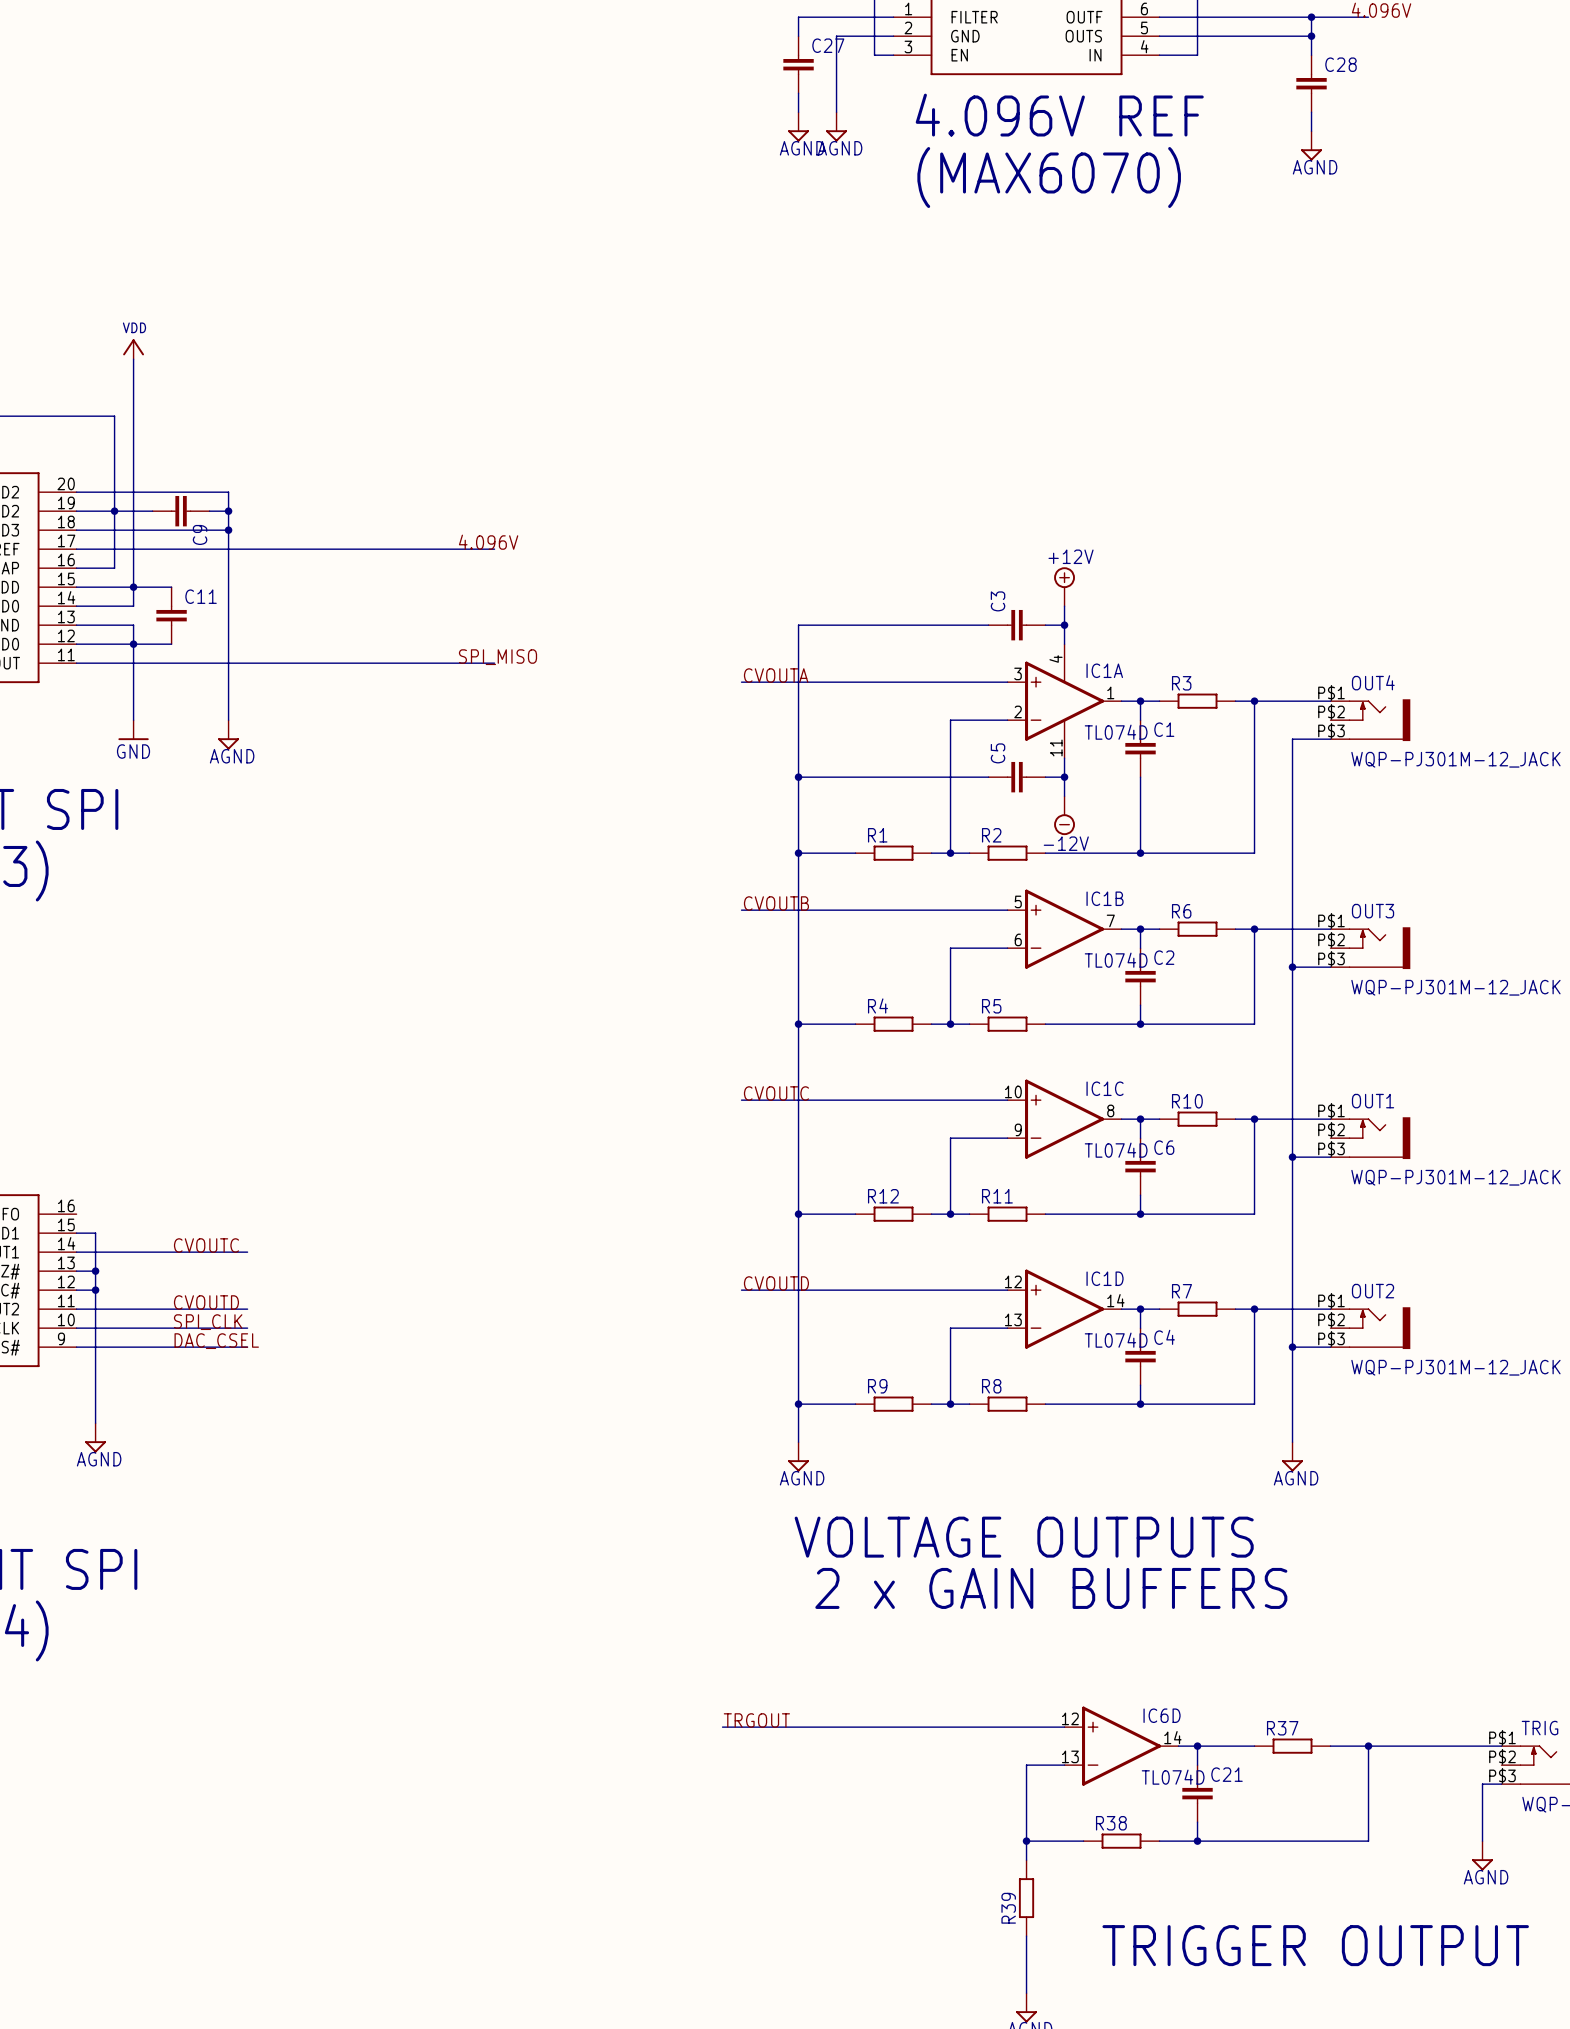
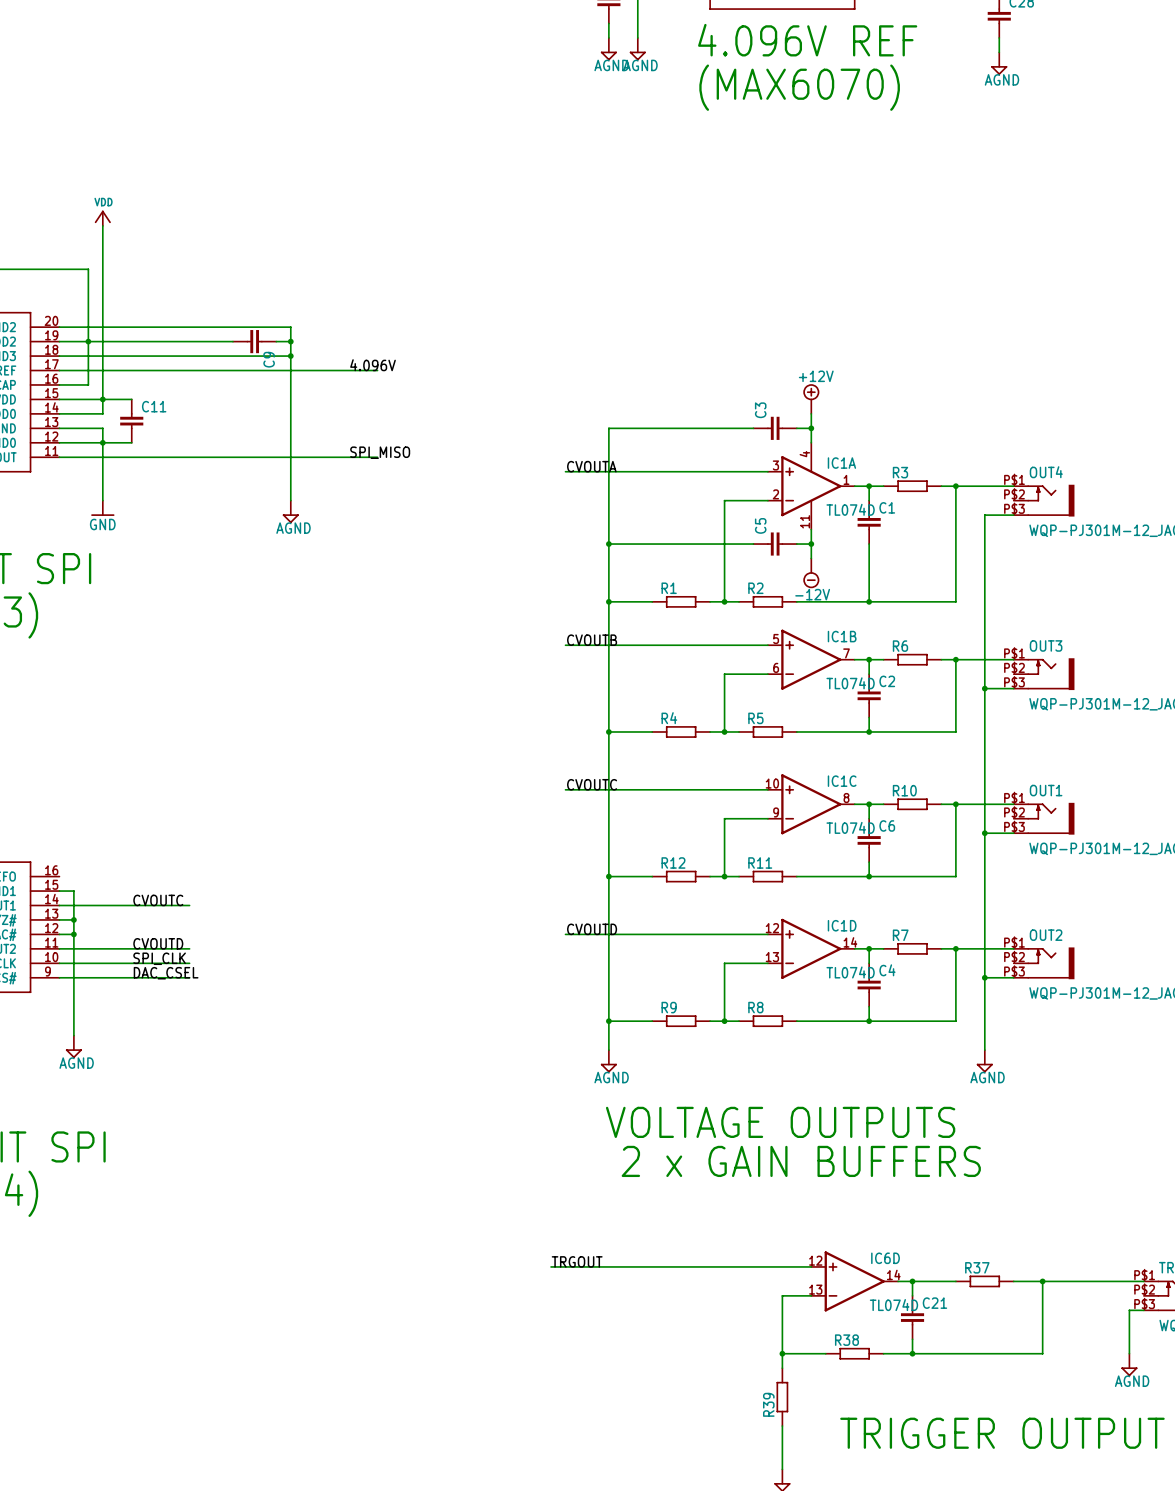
wire: (228, 492) (228, 720) -> (175, 327) (290, 327) (290, 500)
C9 position: (181, 511) -> (254, 341)
wire: none -> (175, 341) (232, 341)
junction: (228, 511) -> none
wire: none -> (276, 341) (290, 341)
junction: none -> (290, 341)
wire: none -> (175, 356) (290, 356)
junction: (228, 530) -> none
junction: none -> (290, 356)
power symbol position: AGND (228, 734) -> AGND (290, 511)

